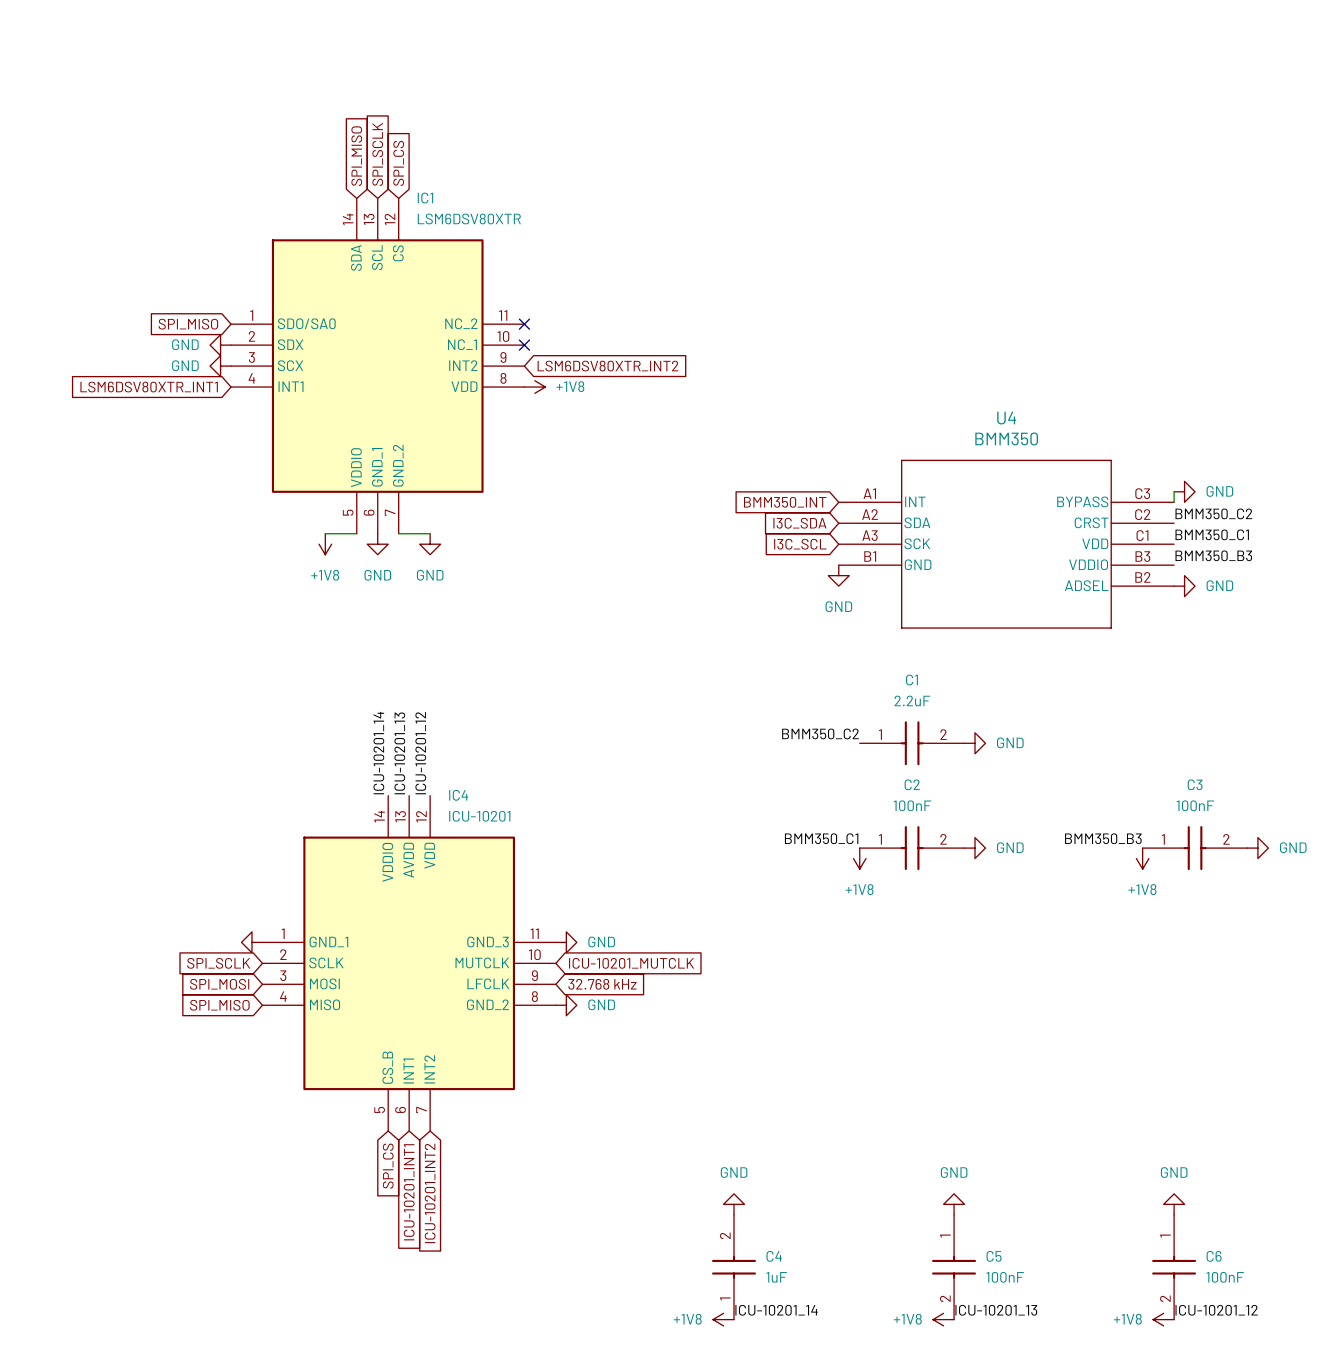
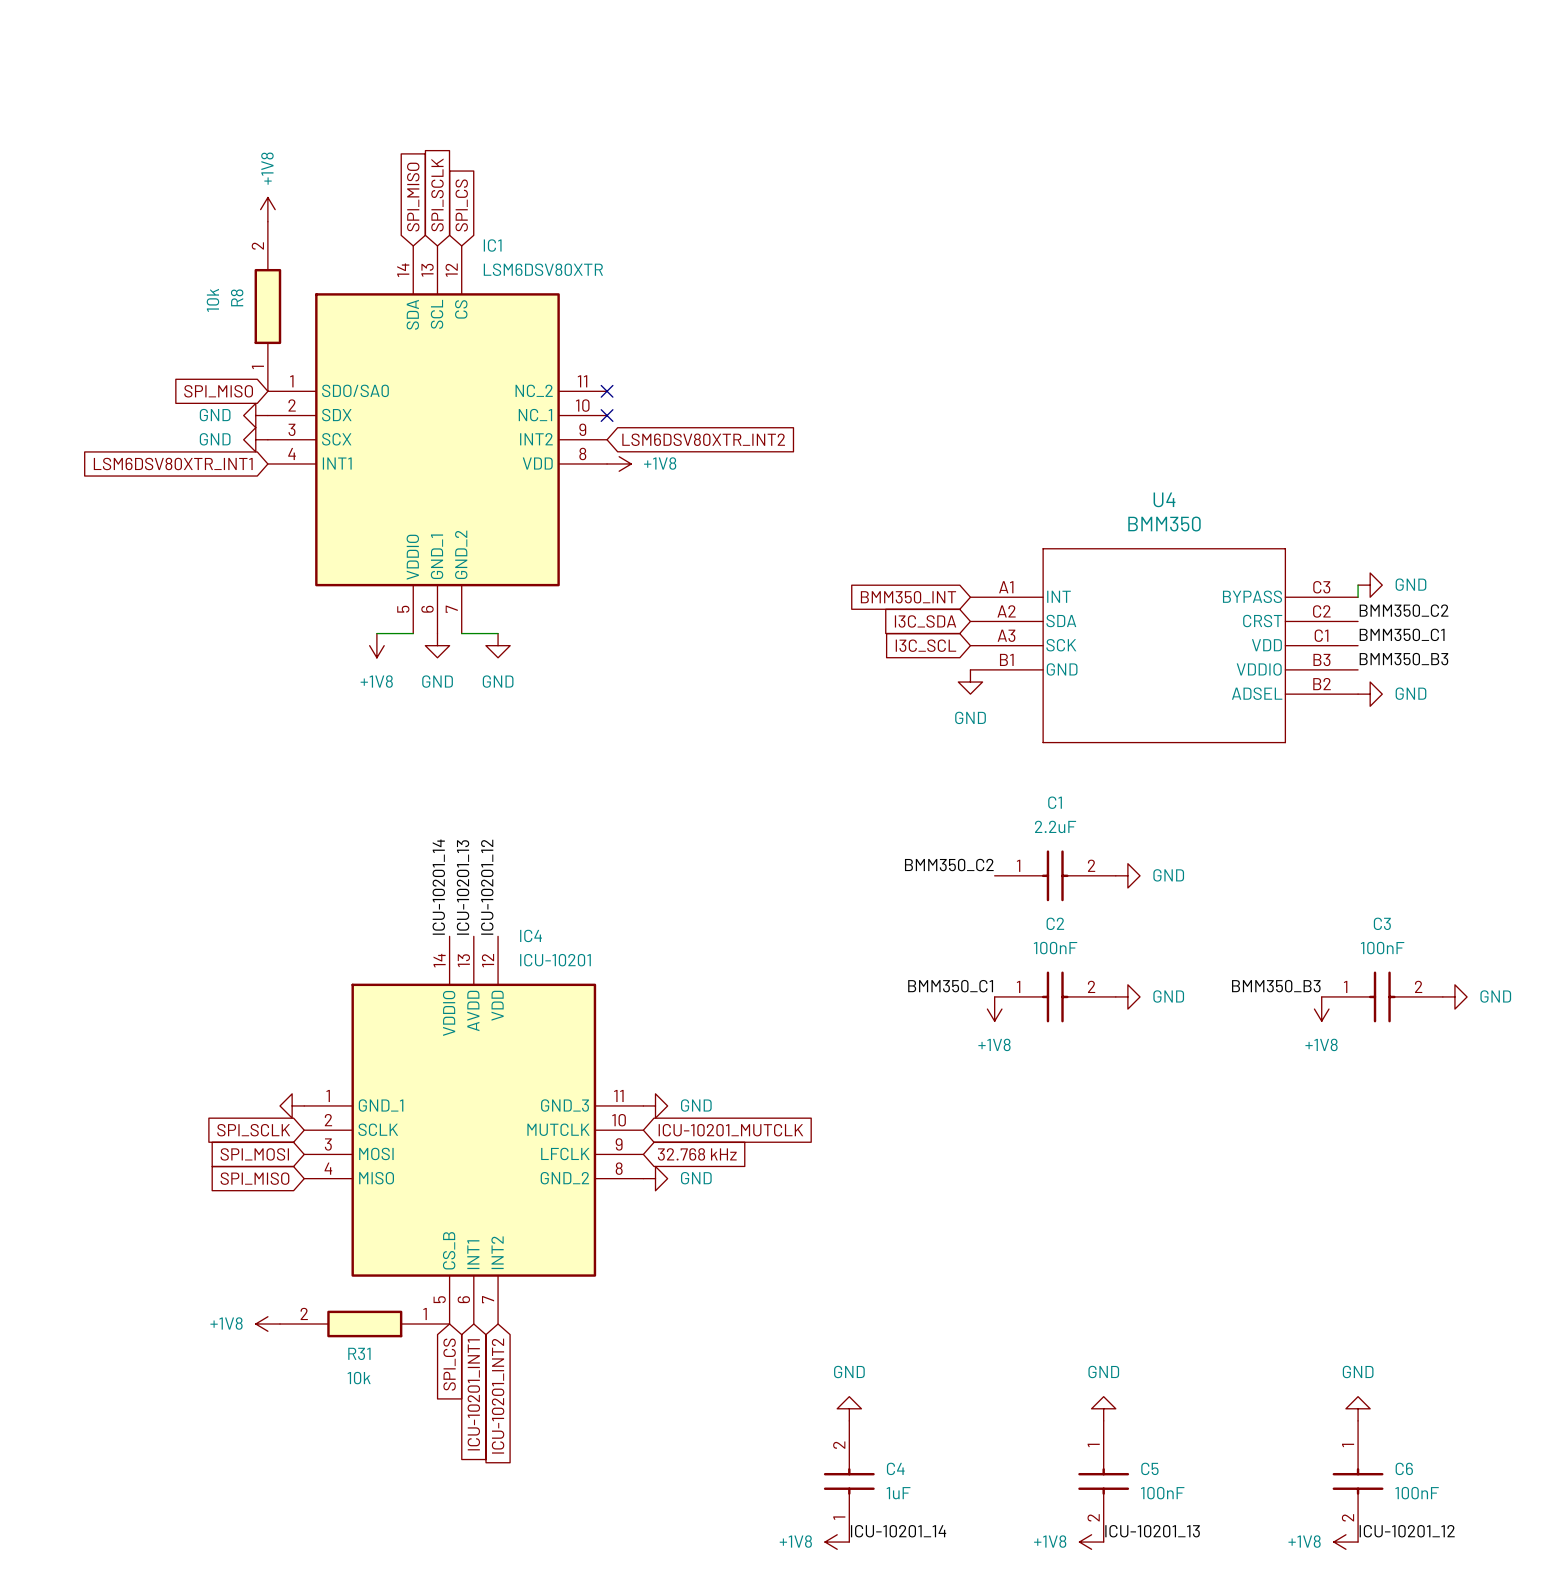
power symbol: none -> +1V8 (267, 209)
R8: none -> 10k (267, 306)
power symbol: none -> +1V8 (267, 1324)
R31: none -> 10k (364, 1324)

